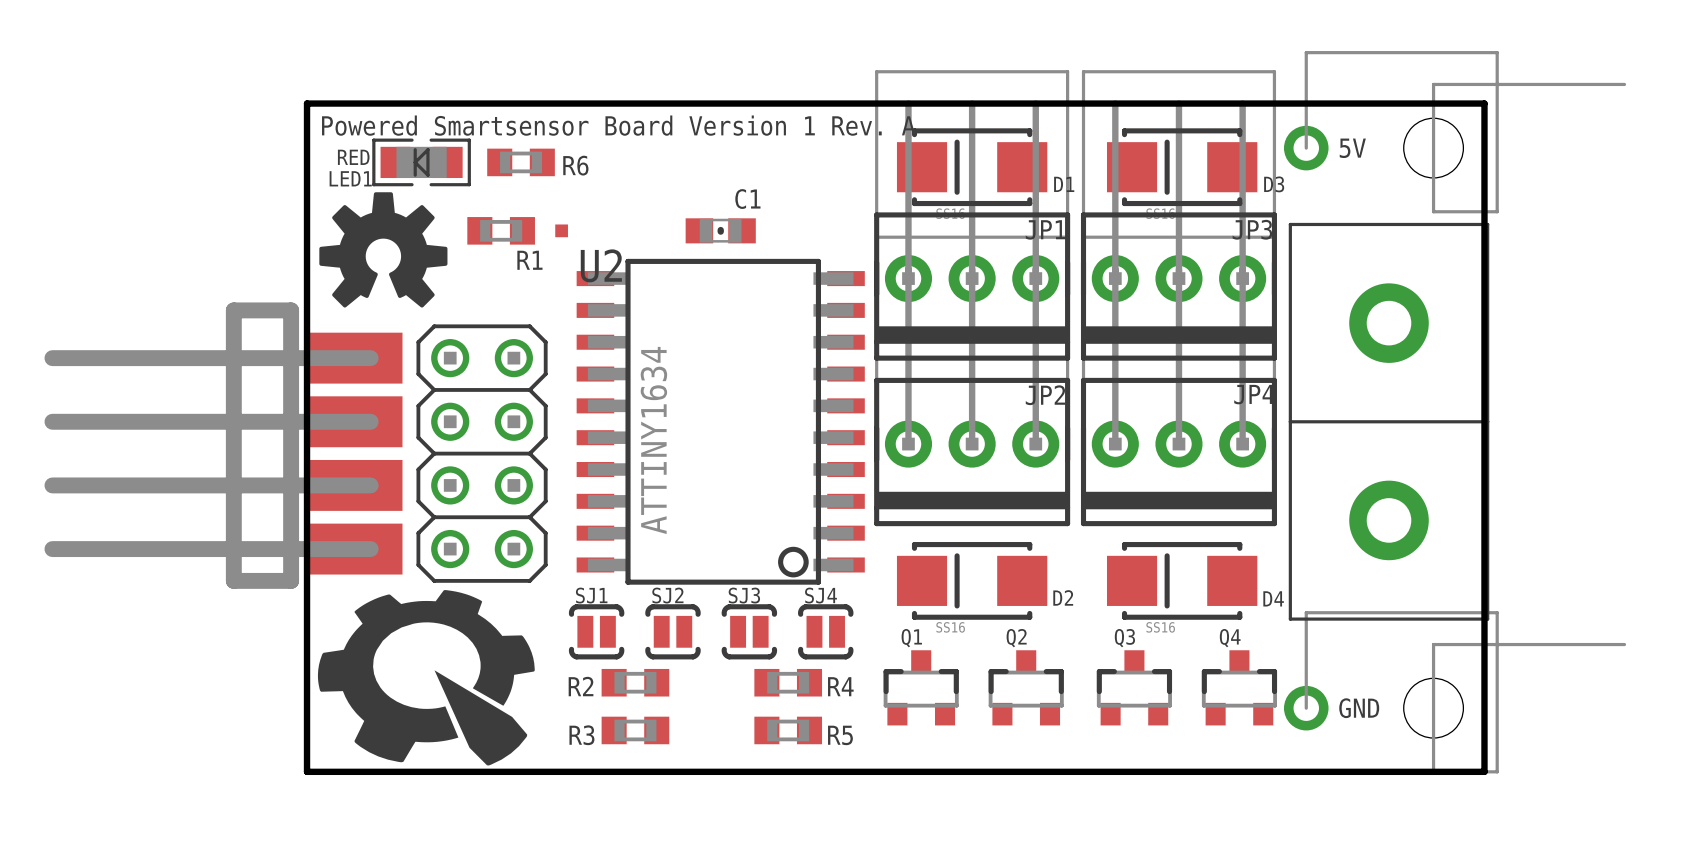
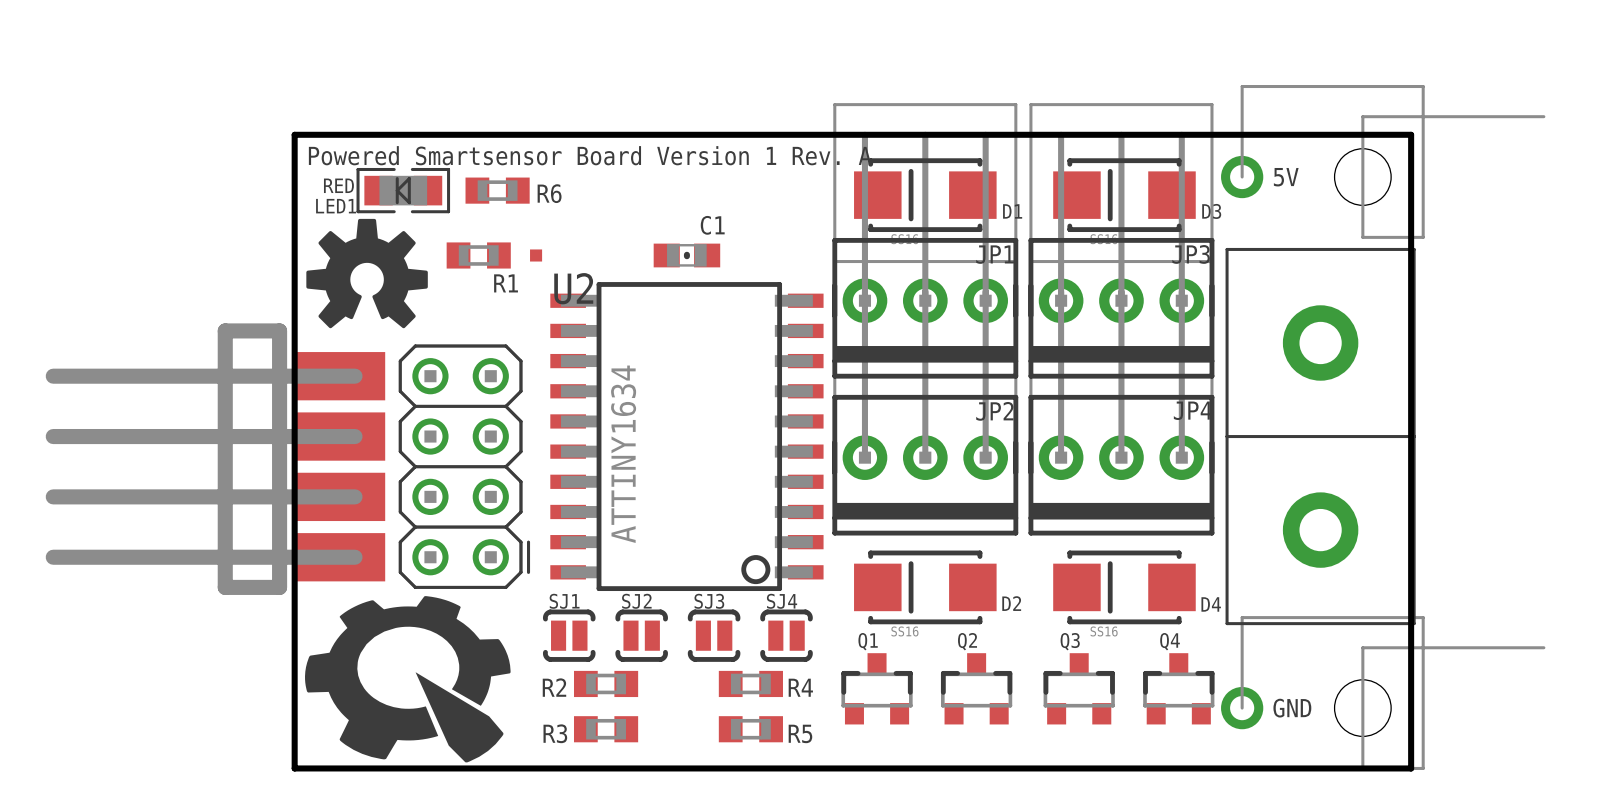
part footprint: [416, 324, 548, 583] -> [398, 344, 531, 589]

